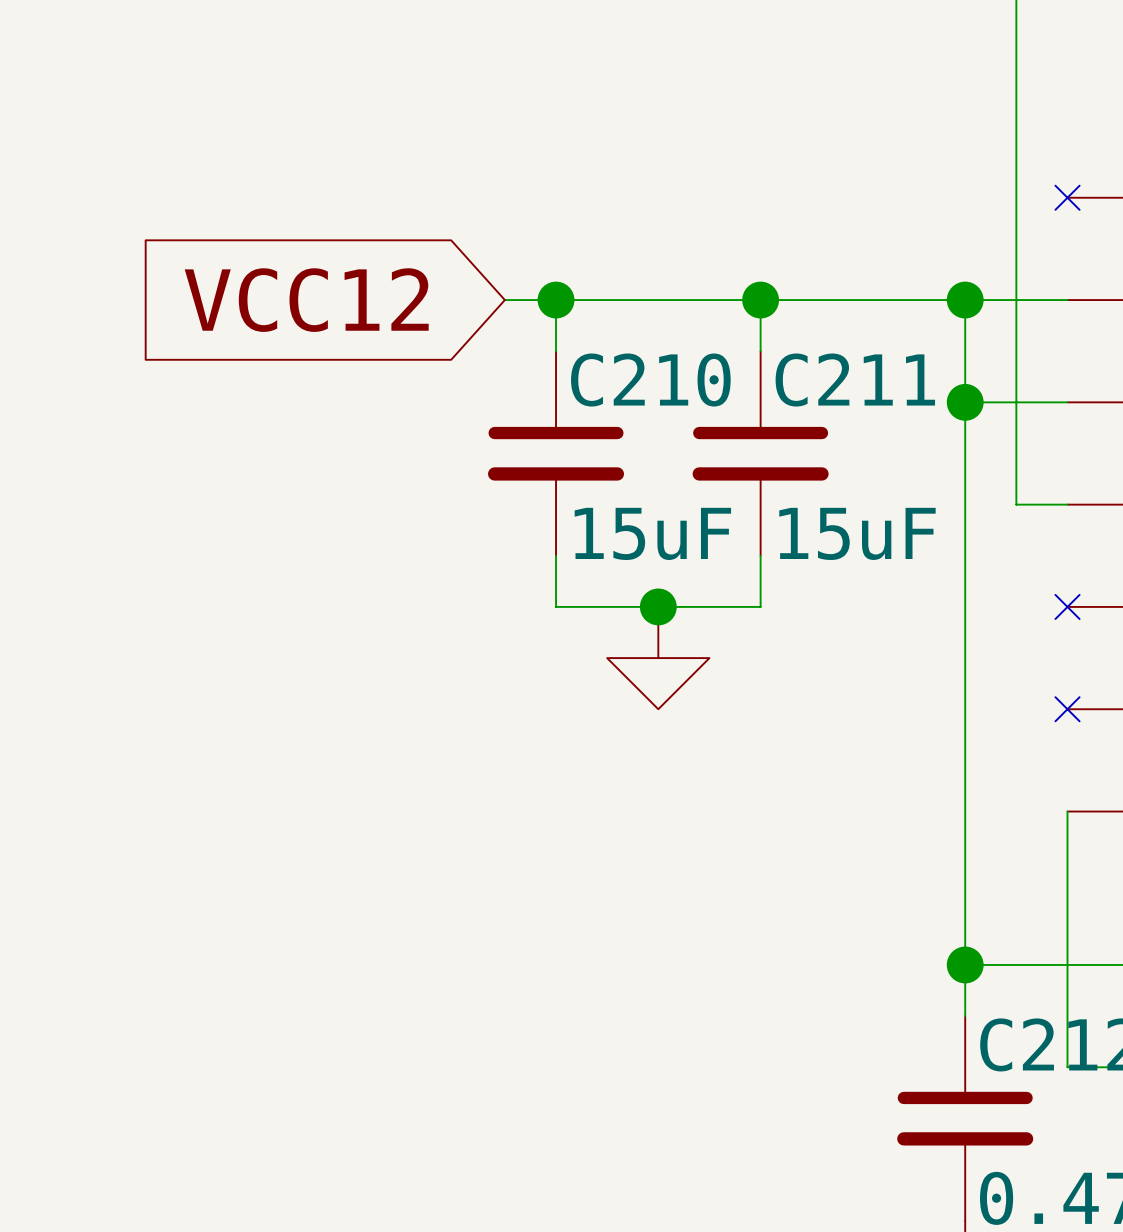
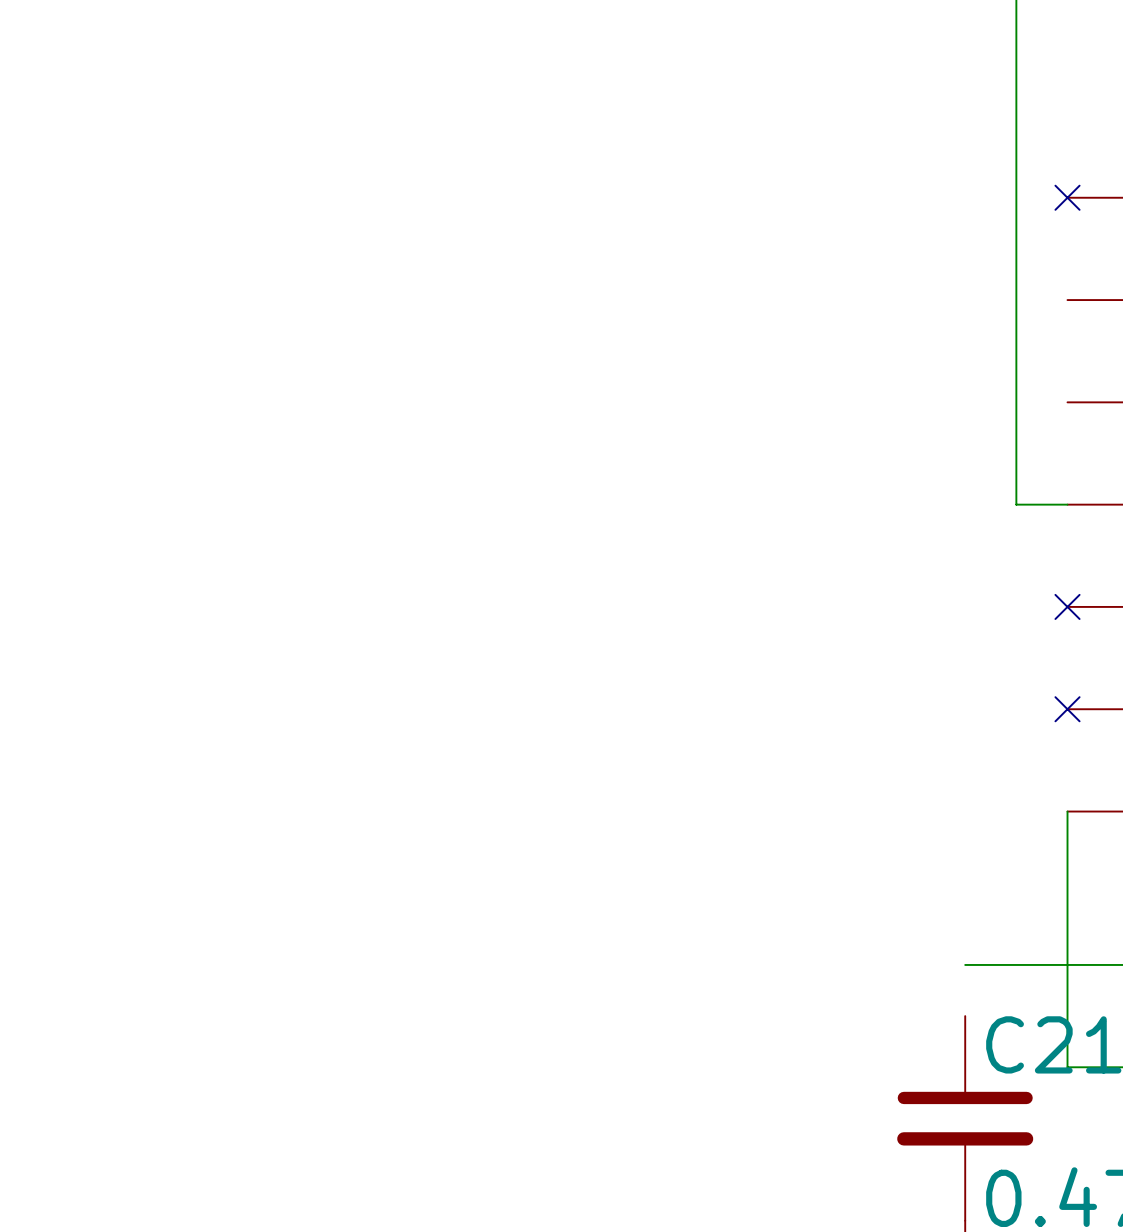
global label: VCC12 (306, 300) -> none
wire: (504, 300) (1067, 300) -> none
wire: (556, 300) (556, 351) -> none
junction: (556, 300) -> none
wire: (760, 300) (760, 351) -> none
junction: (760, 300) -> none
wire: (965, 300) (965, 1016) -> none
junction: (965, 300) -> none
wire: (965, 402) (1067, 402) -> none
junction: (965, 402) -> none
C210: 15uF (556, 453) -> none
C211: 15uF (760, 453) -> none
wire: (556, 555) (556, 606) (760, 606) (760, 555) -> none
junction: (658, 606) -> none
power symbol: (658, 658) -> none
junction: (965, 964) -> none

